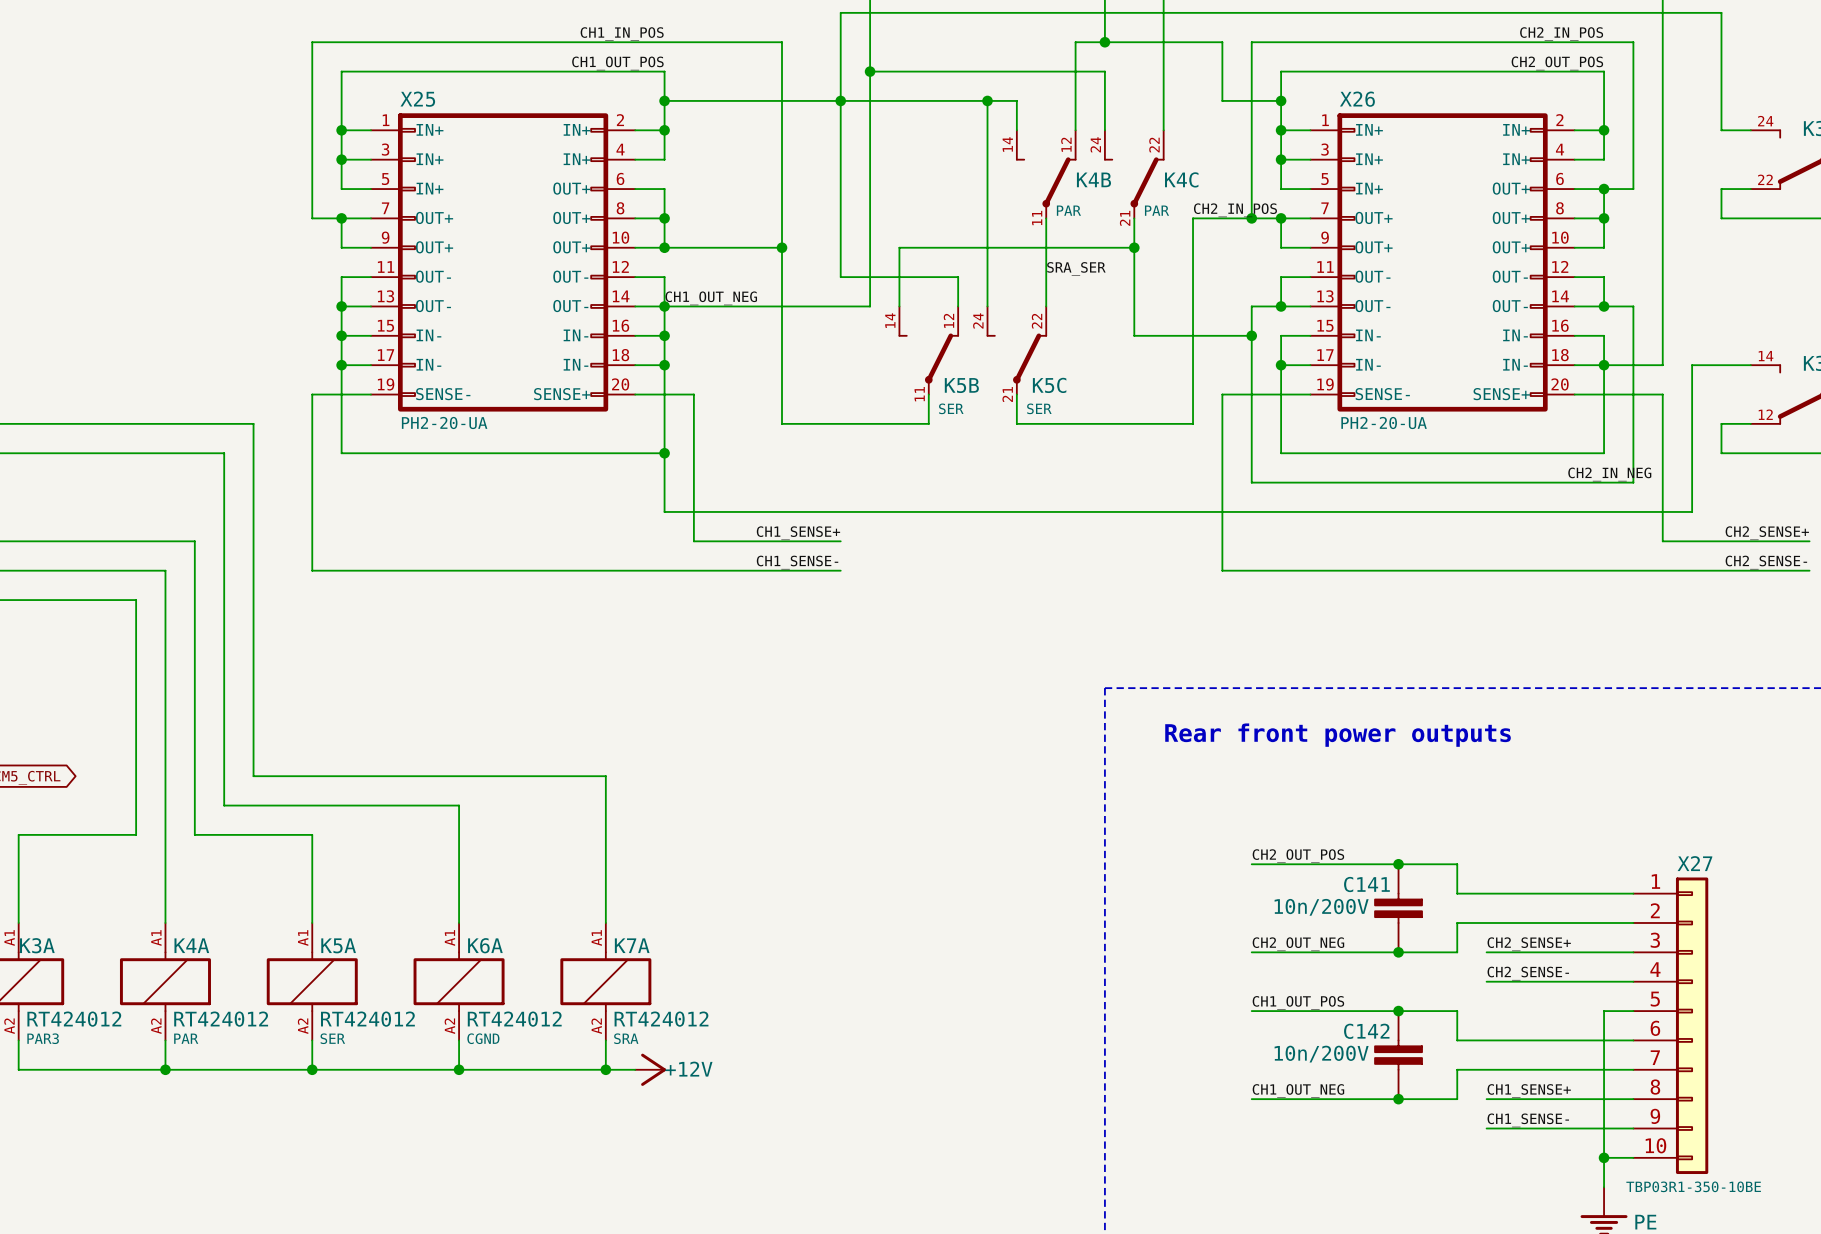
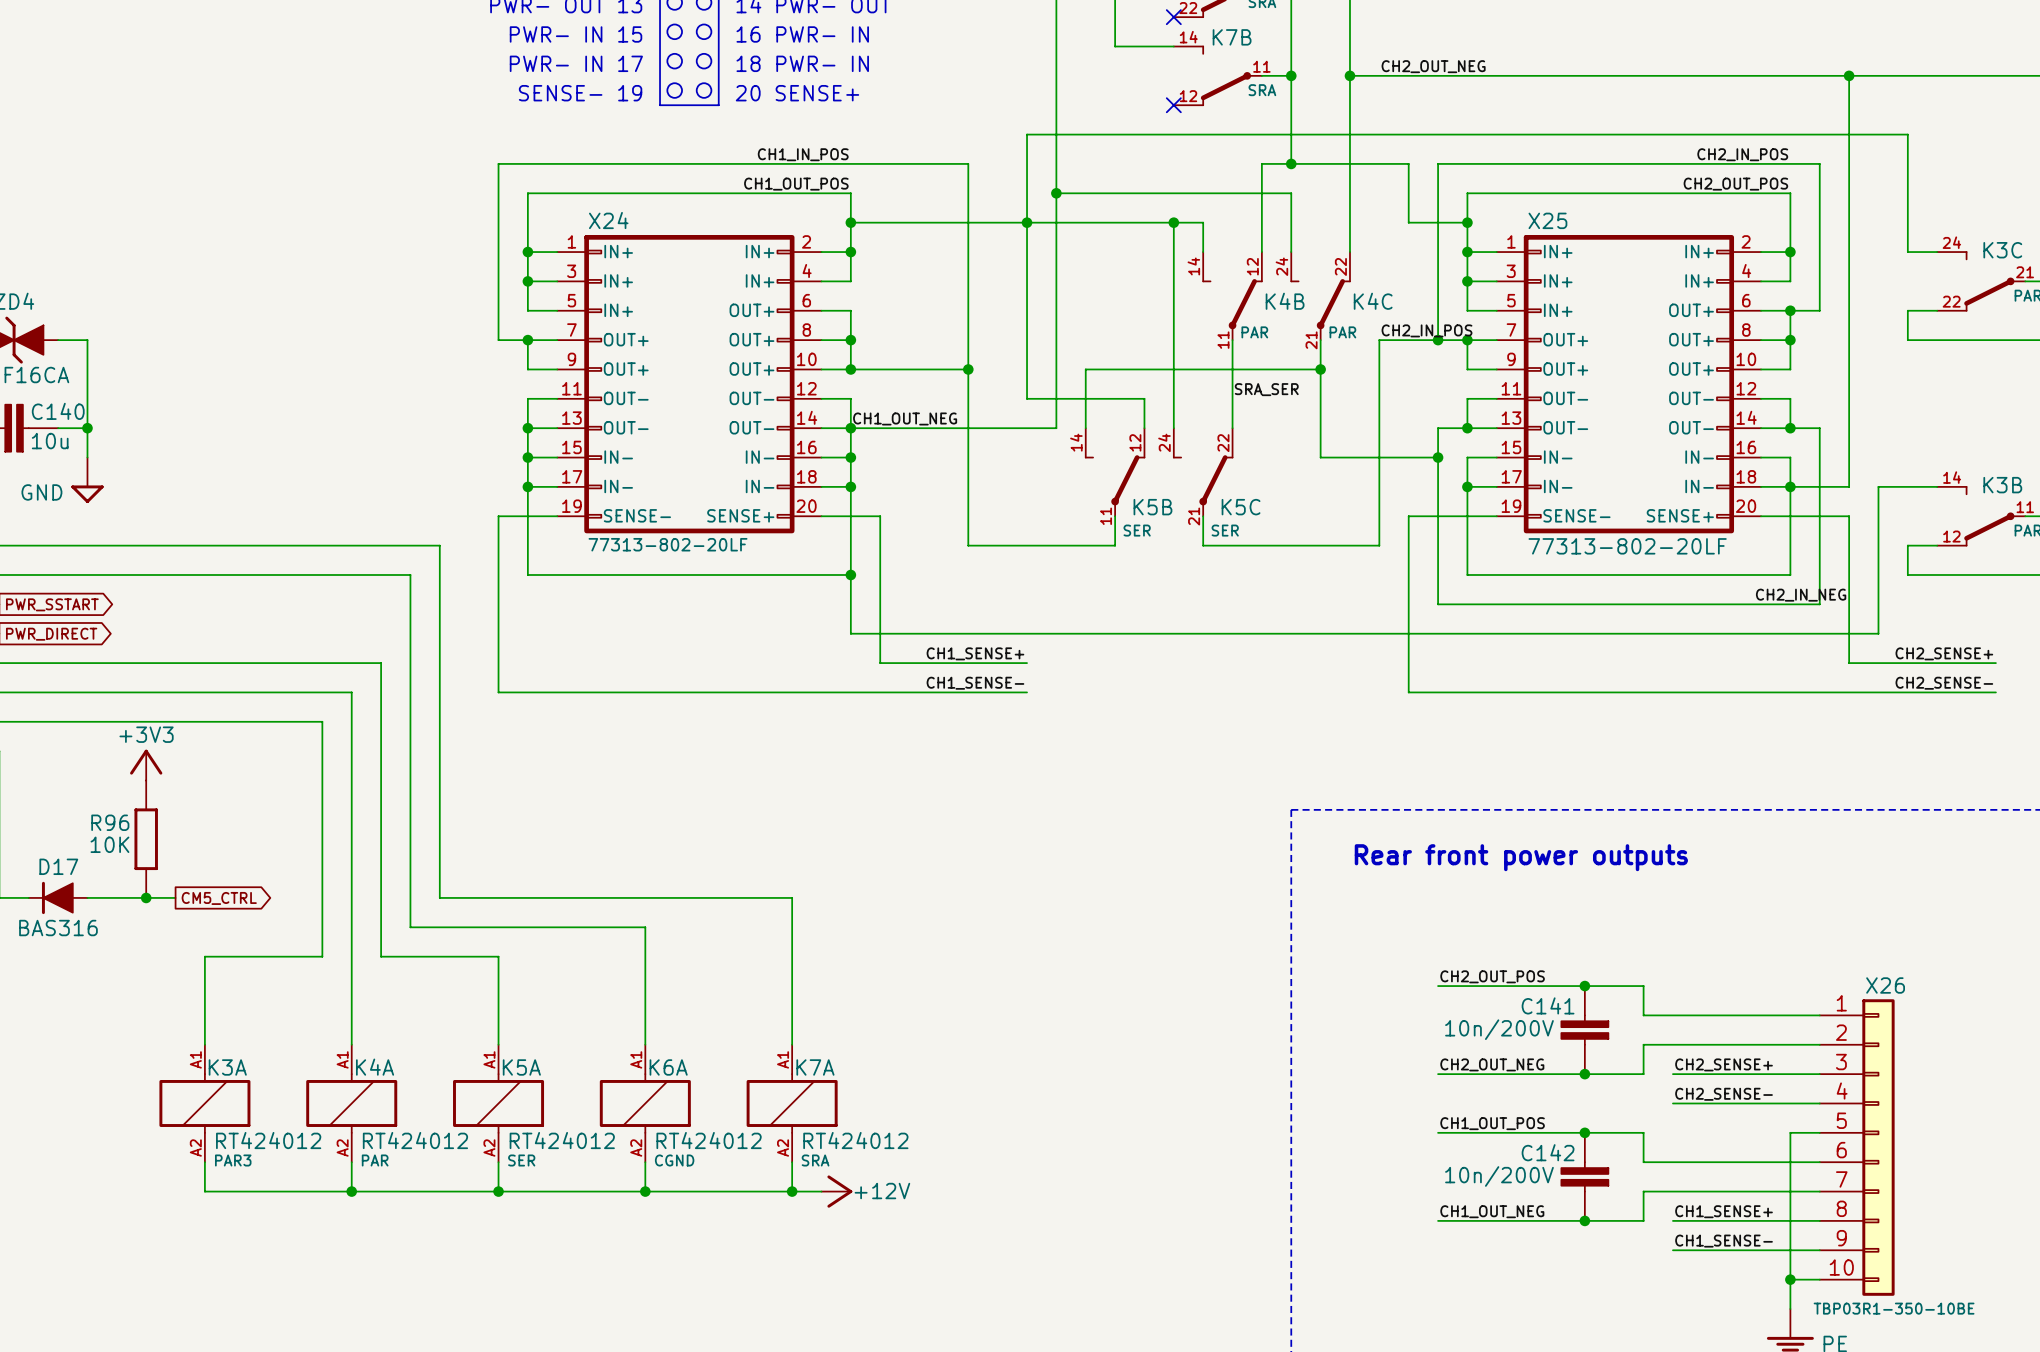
X25 name: X25 (417, 99) -> X24 (608, 220)
X26 name: X26 (1357, 99) -> X25 (1547, 220)
X25 value: PH2-20-UA (444, 423) -> 77313-802-20LF (668, 544)
X26 value: PH2-20-UA (1384, 423) -> 77313-802-20LF (1627, 546)
X27 name: X27 (1694, 863) -> X26 (1885, 985)

